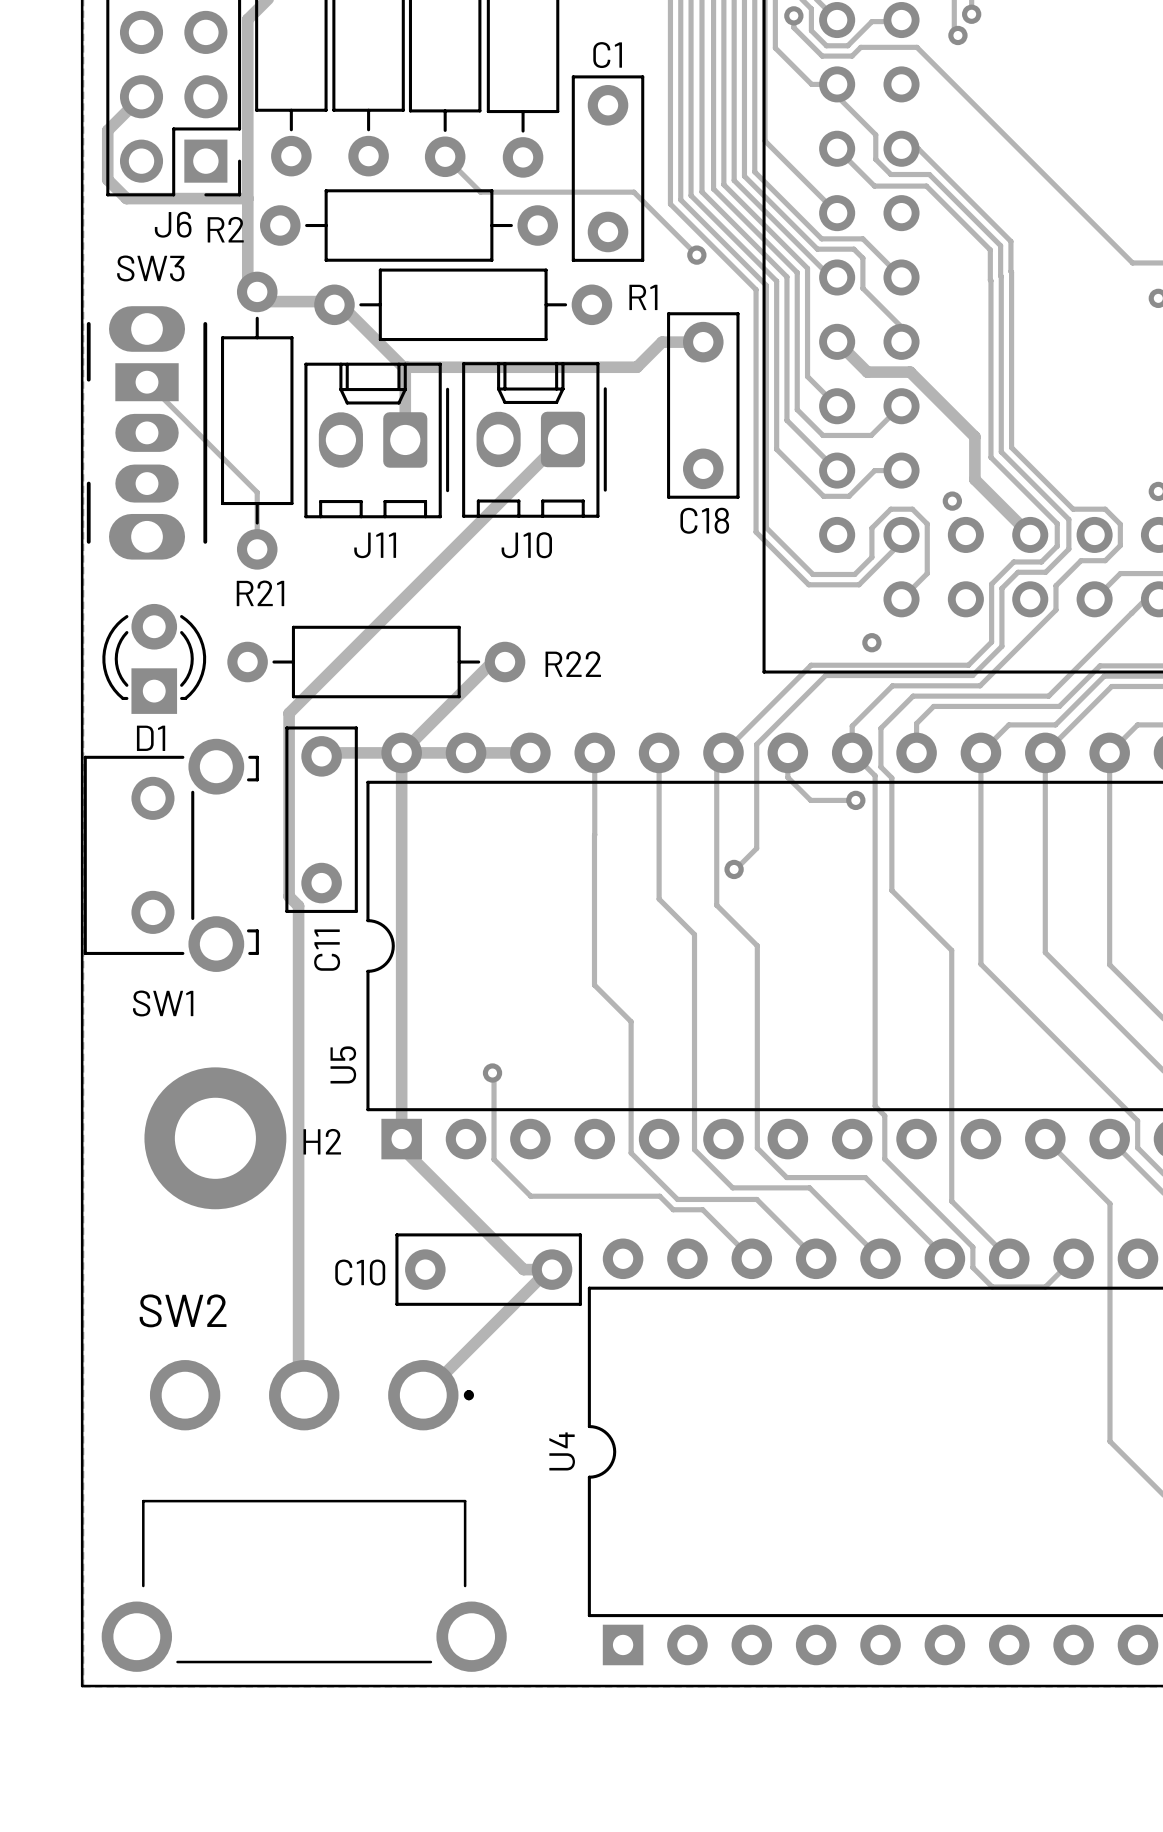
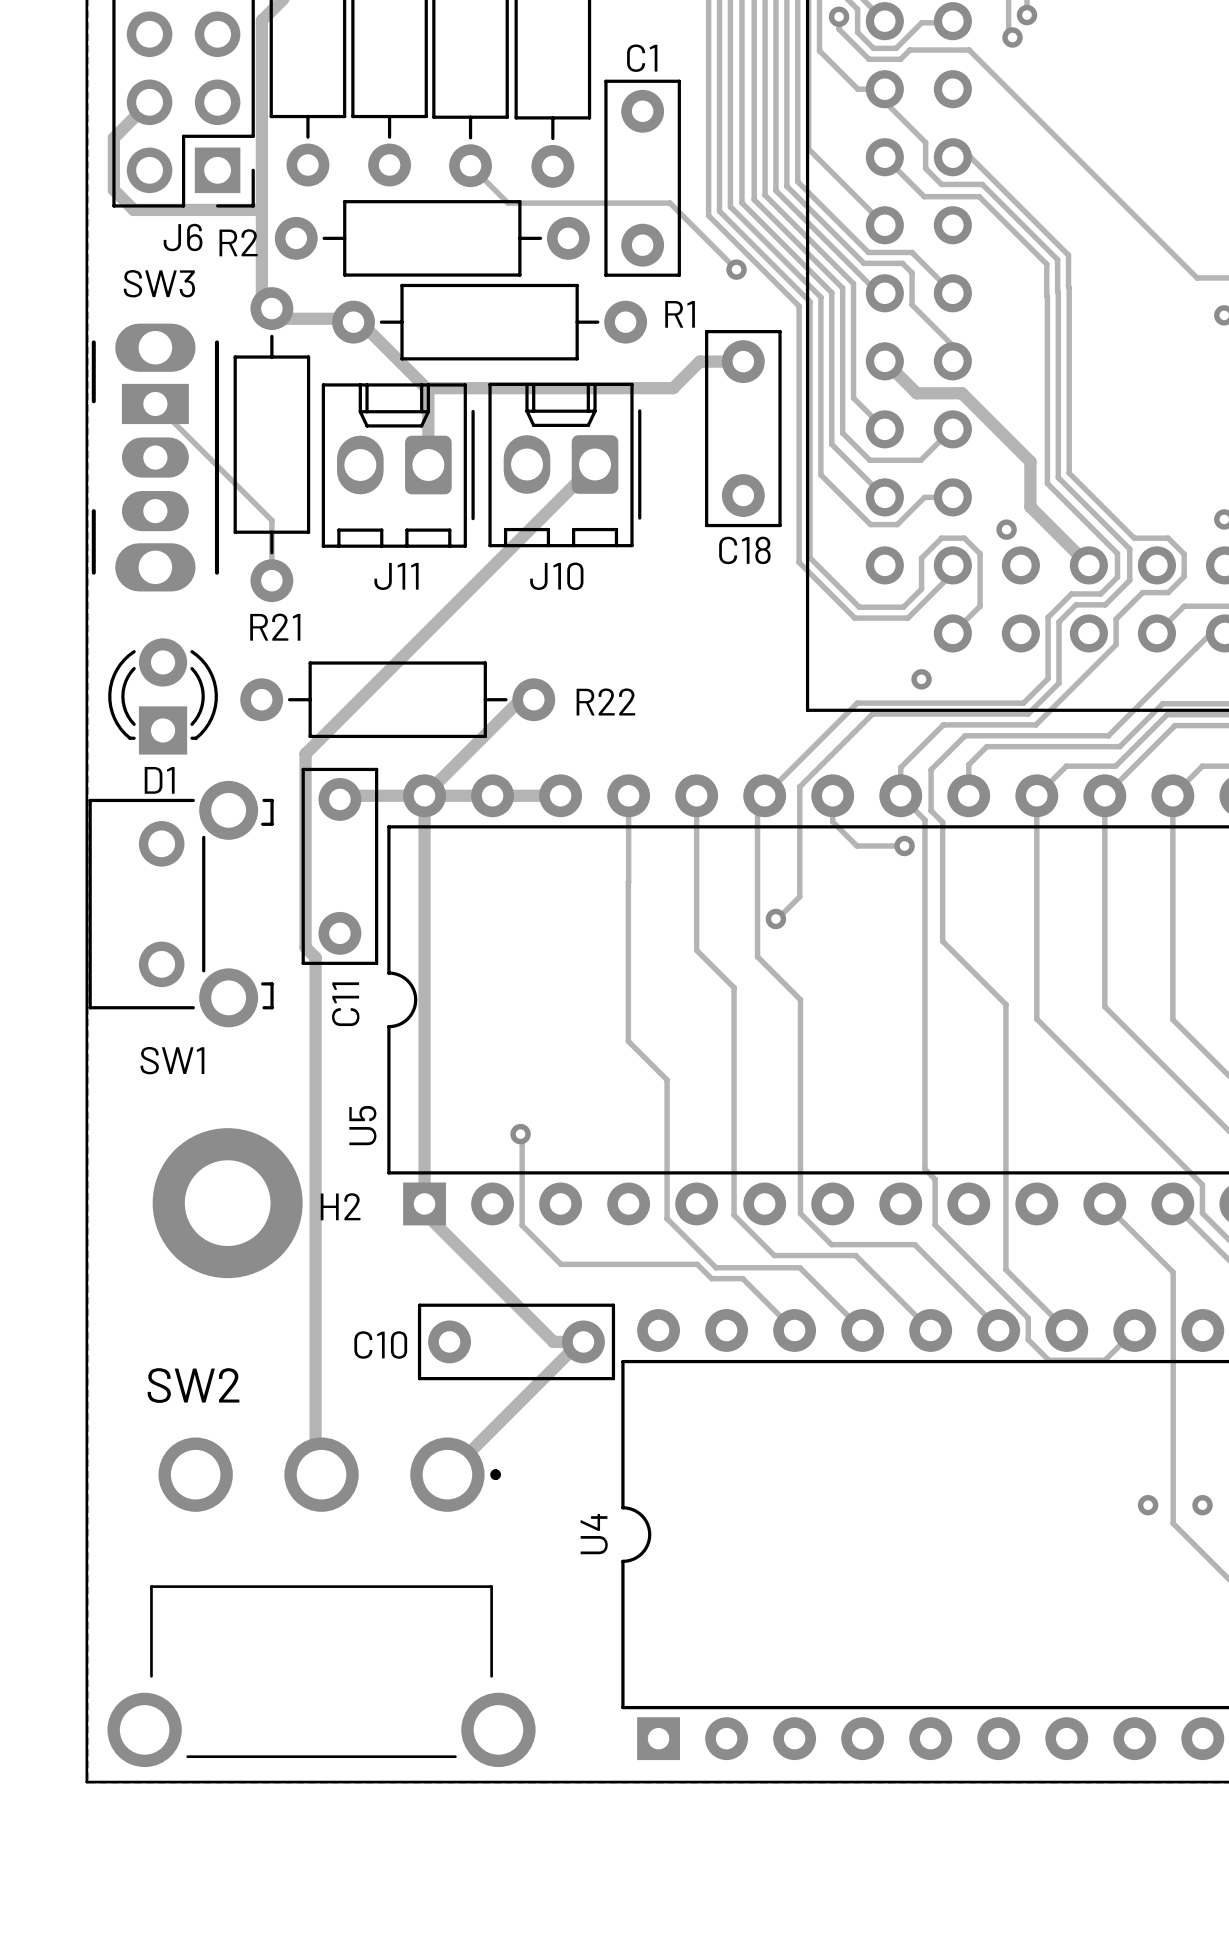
via: none -> (1148, 1505)
via: none -> (1202, 1505)

